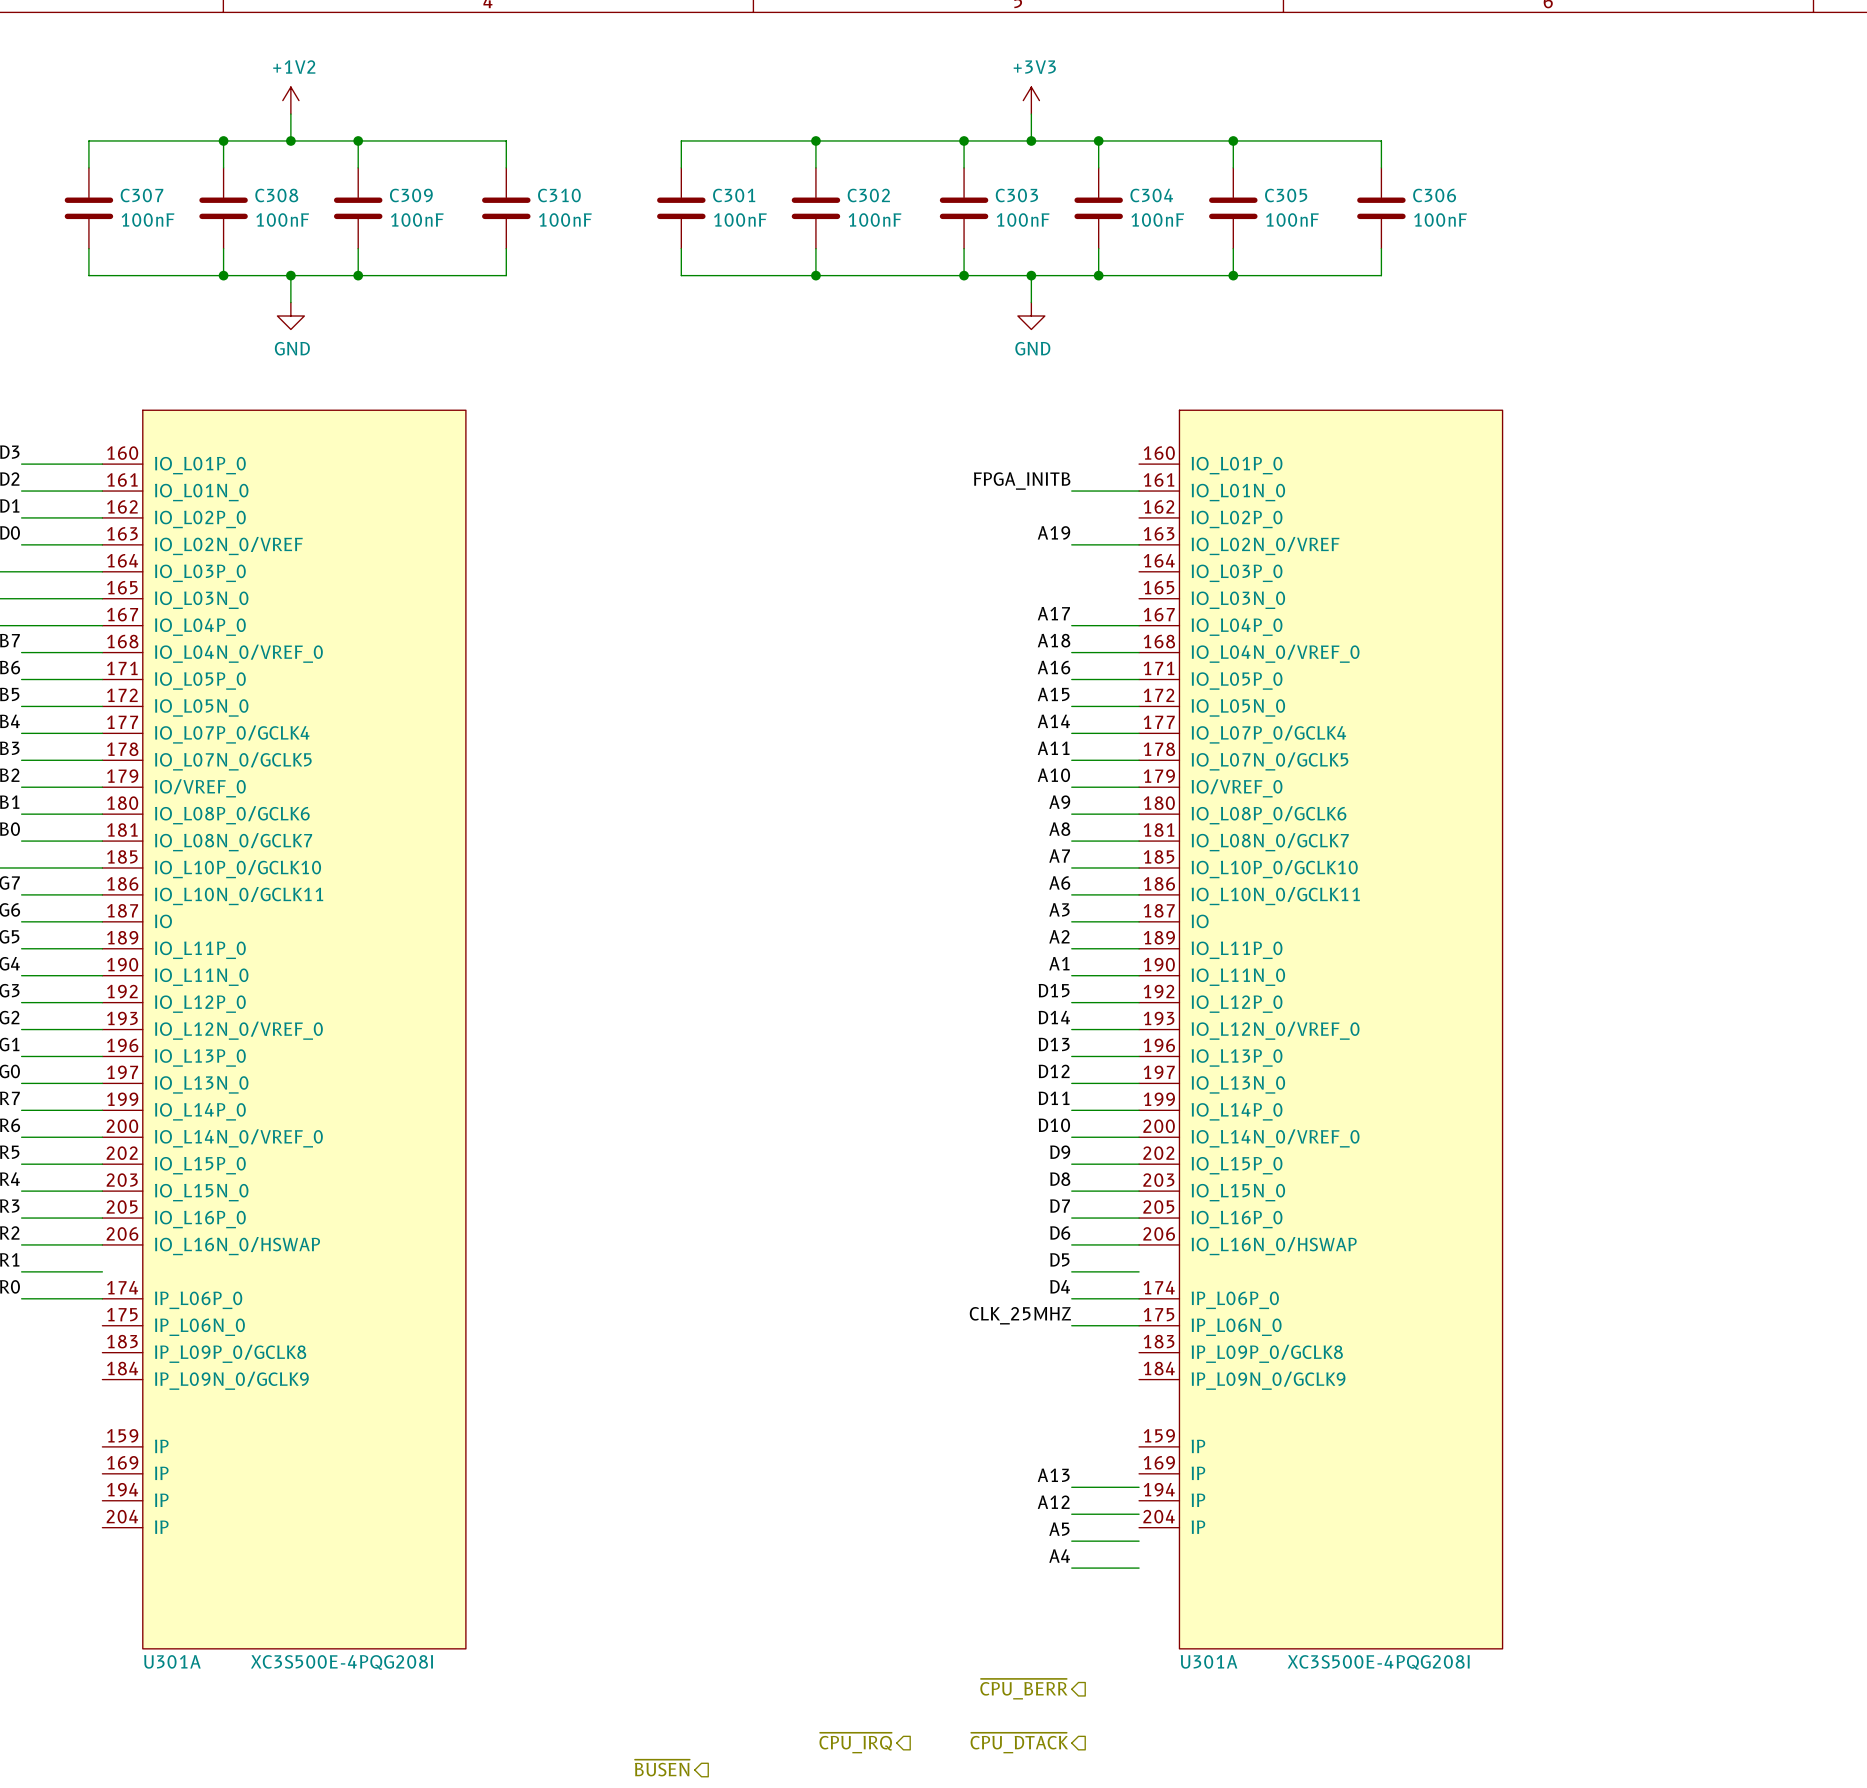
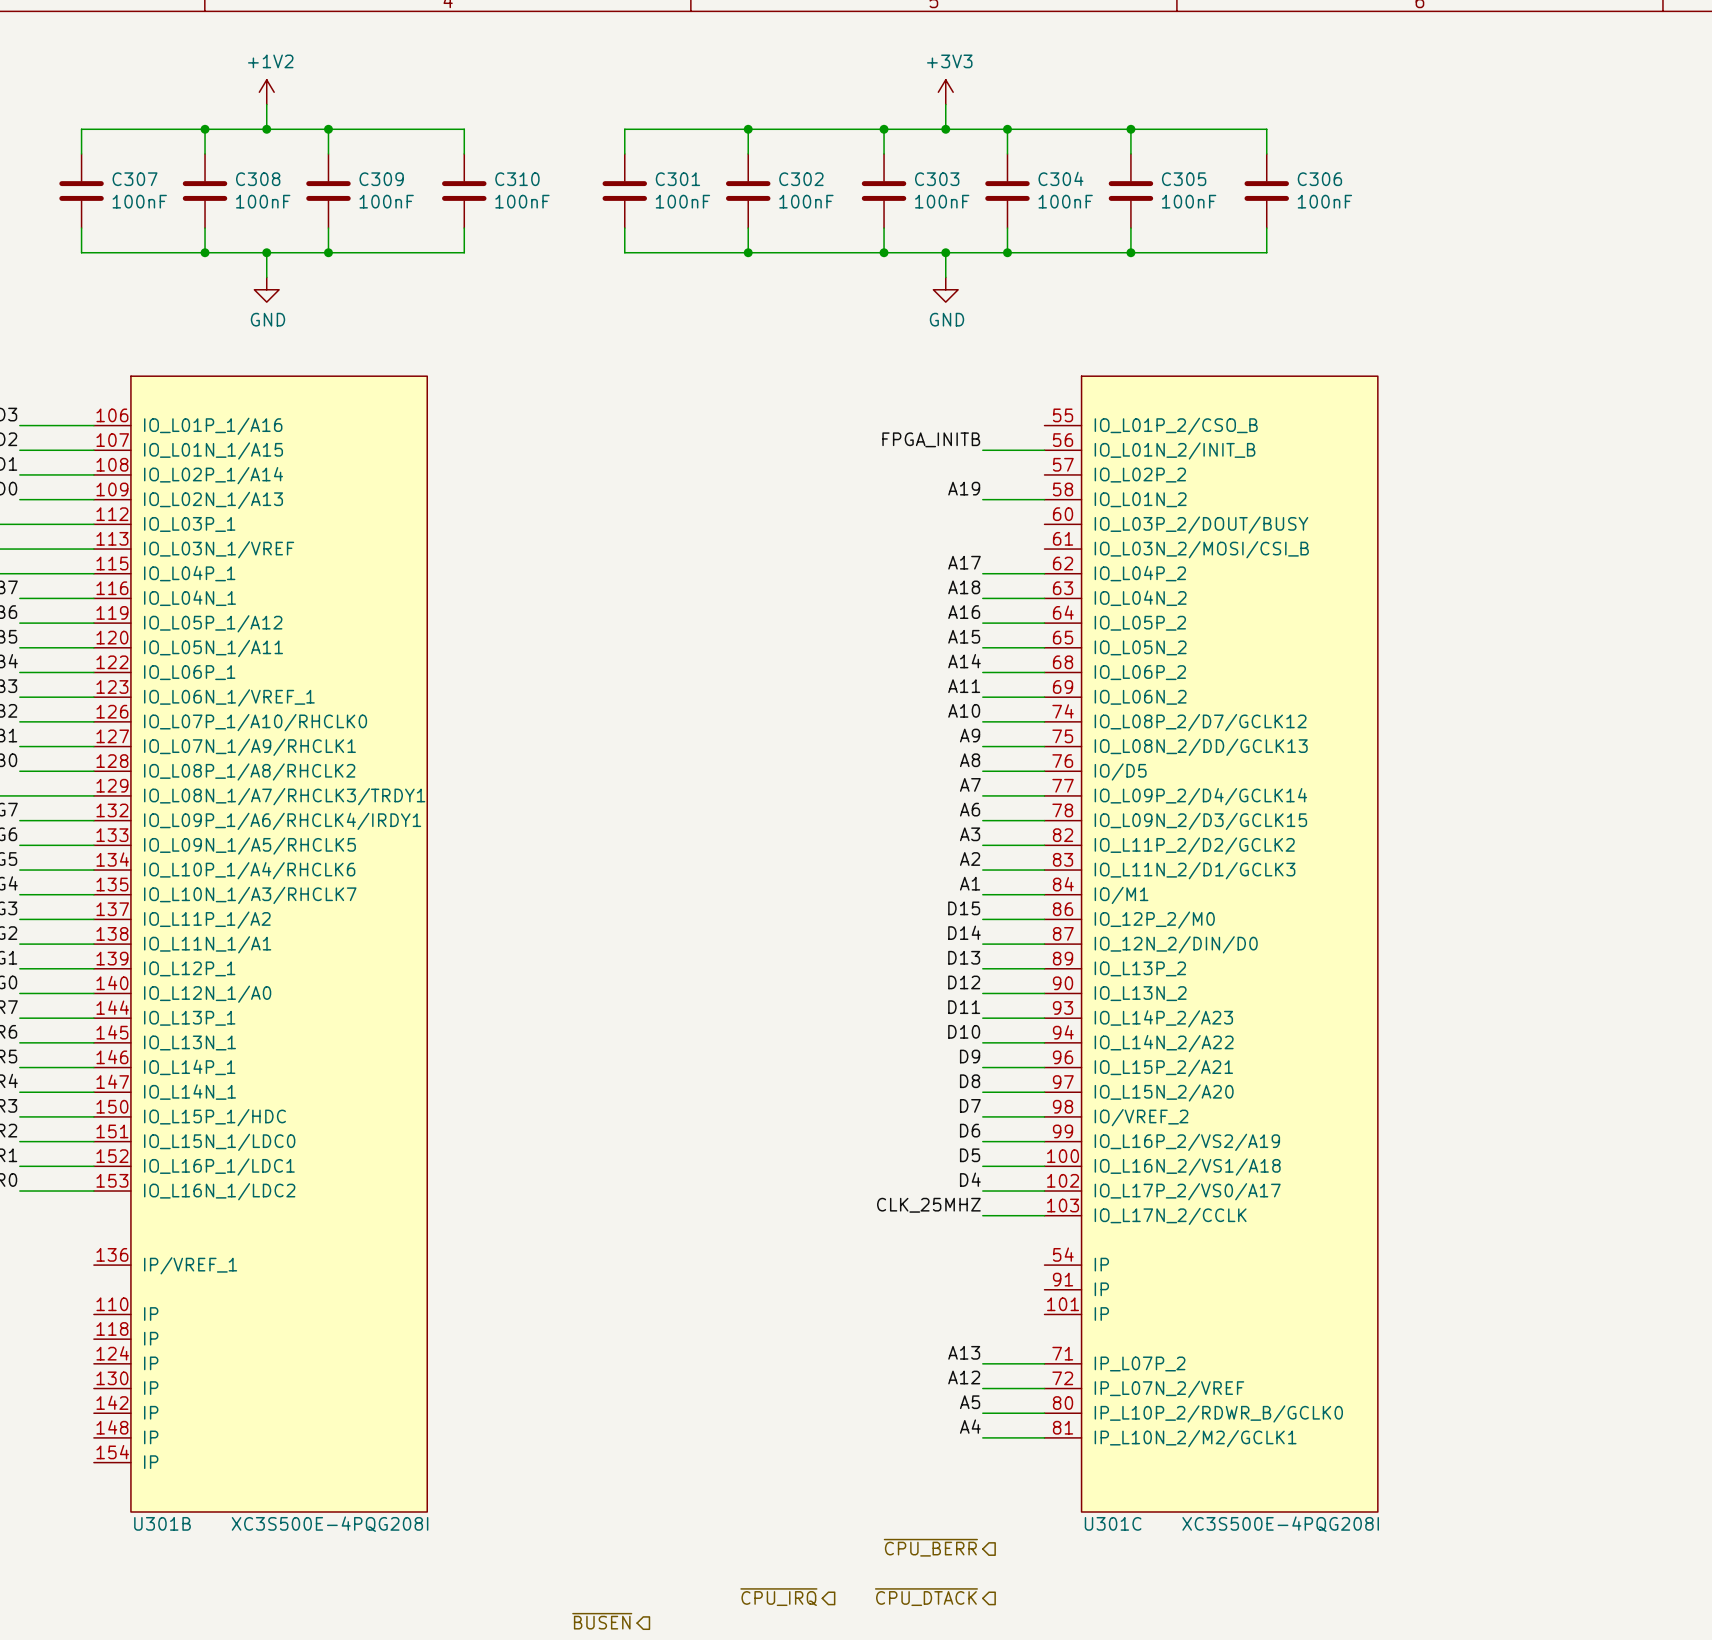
U301A: XC3S500E-4PQG208I (284, 1029) -> none
U301B: none -> XC3S500E-4PQG208I (260, 944)
U301A: XC3S500E-4PQG208I (1320, 1029) -> none
U301C: none -> XC3S500E-4PQG208I (1211, 944)

